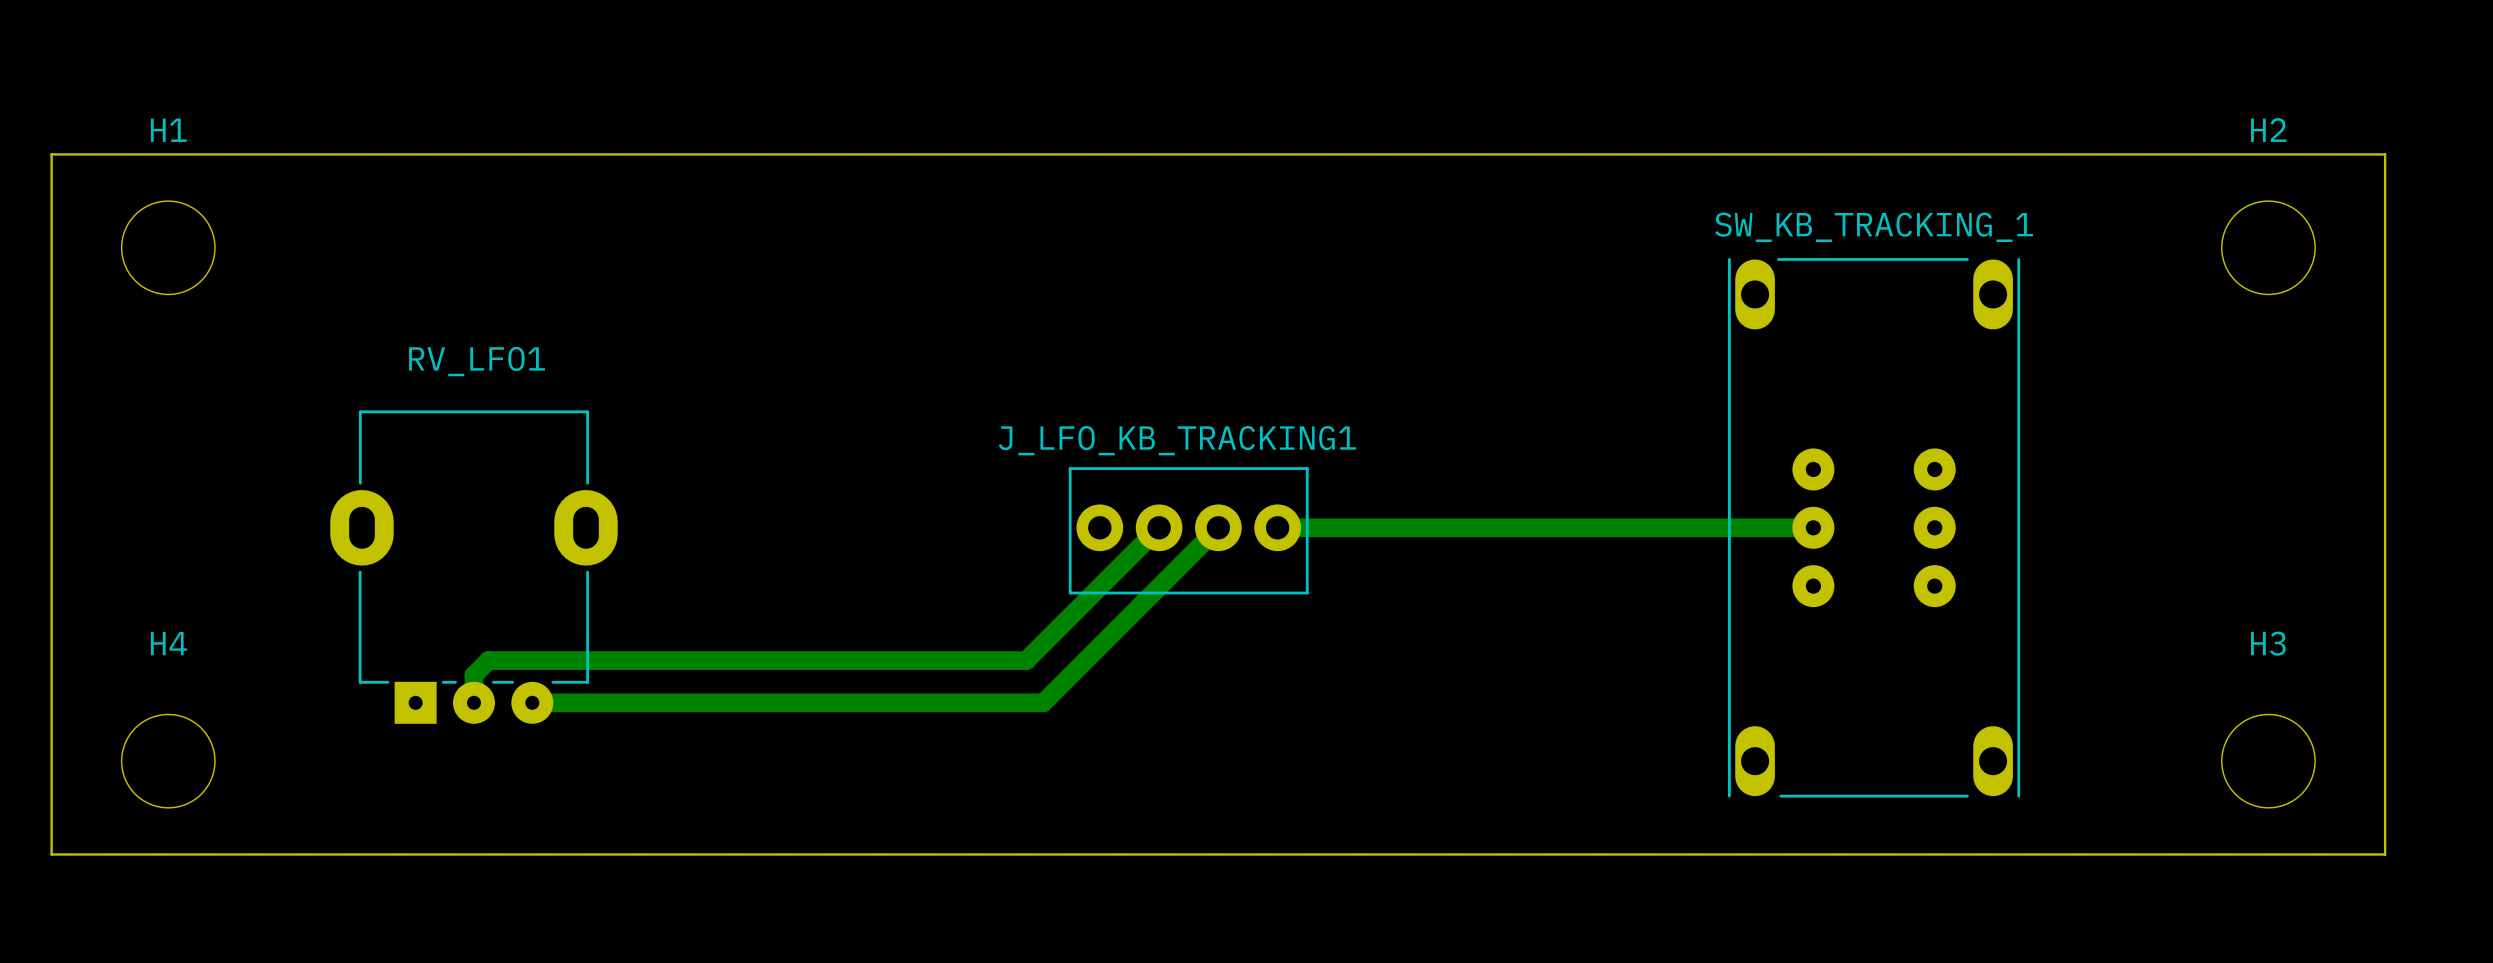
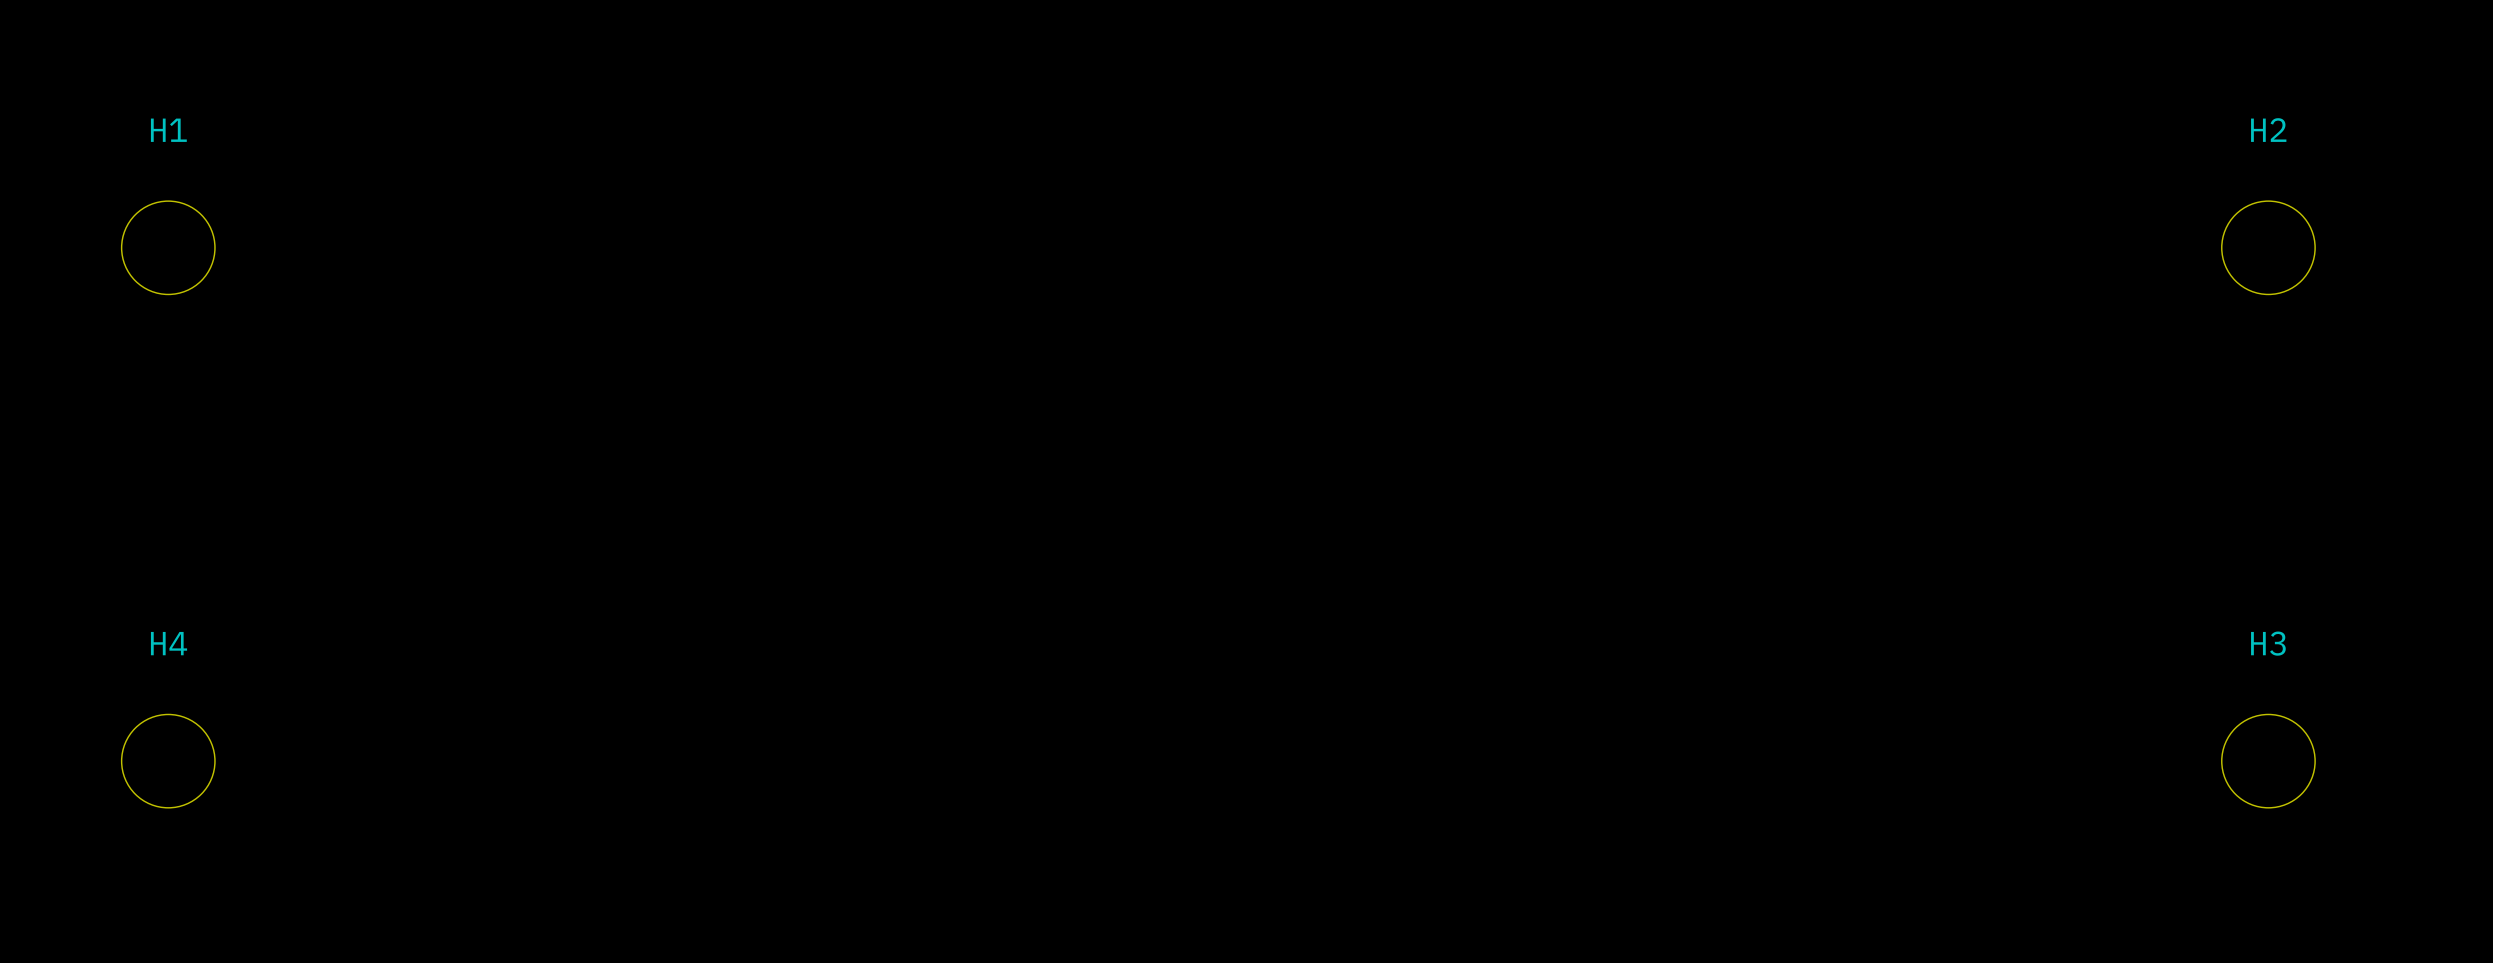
board edge: (51, 154) (2385, 154) (2385, 854) (51, 854) (51, 154) -> none
bottom track: (1159, 527) (1026, 660) (488, 660) (473, 675) (473, 702) -> none
bottom track: (1218, 527) (1043, 702) (529, 702) -> none
bottom track: (1277, 527) (1813, 527) -> none
SW_KB_TRACKING_1: (1874, 527) -> none
J_LFO_KB_TRACKING1: (1188, 530) -> none
RV_LFO1: (473, 567) -> none

